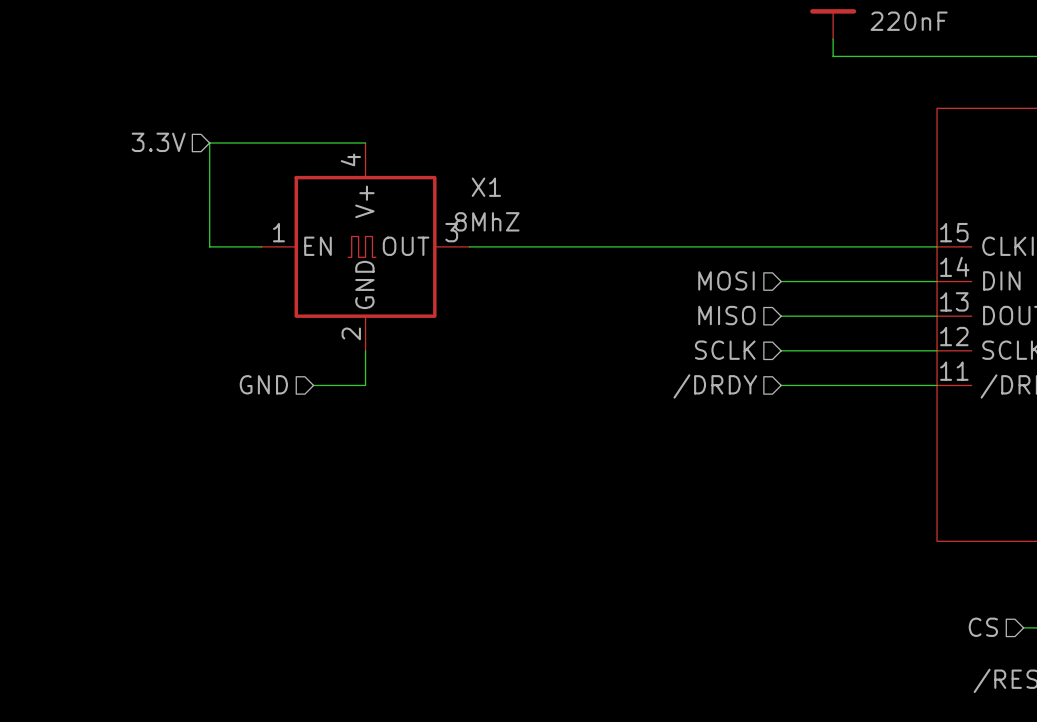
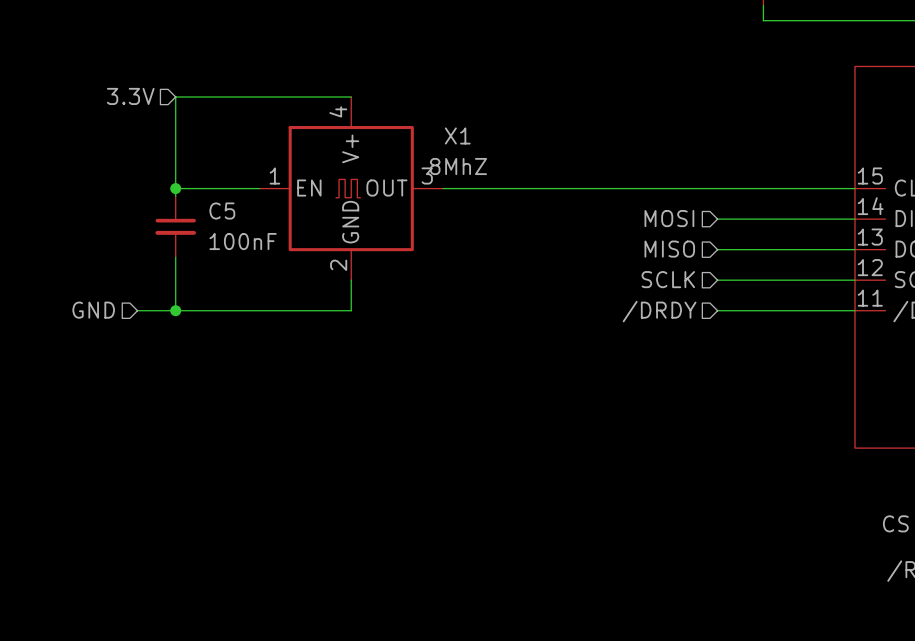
hierarchical label position: 3.3V (158, 142) -> 3.3V (130, 96)
wire: (209, 143) (209, 246) -> (213, 97) (175, 97) (175, 196)
wire: none -> (175, 188) (213, 188)
junction: none -> (175, 188)
C5: none -> 100nF (175, 226)
wire: none -> (175, 257) (175, 310)
hierarchical label position: GND (263, 384) -> GND (93, 310)
wire: none -> (137, 310) (305, 310)
junction: none -> (175, 310)

